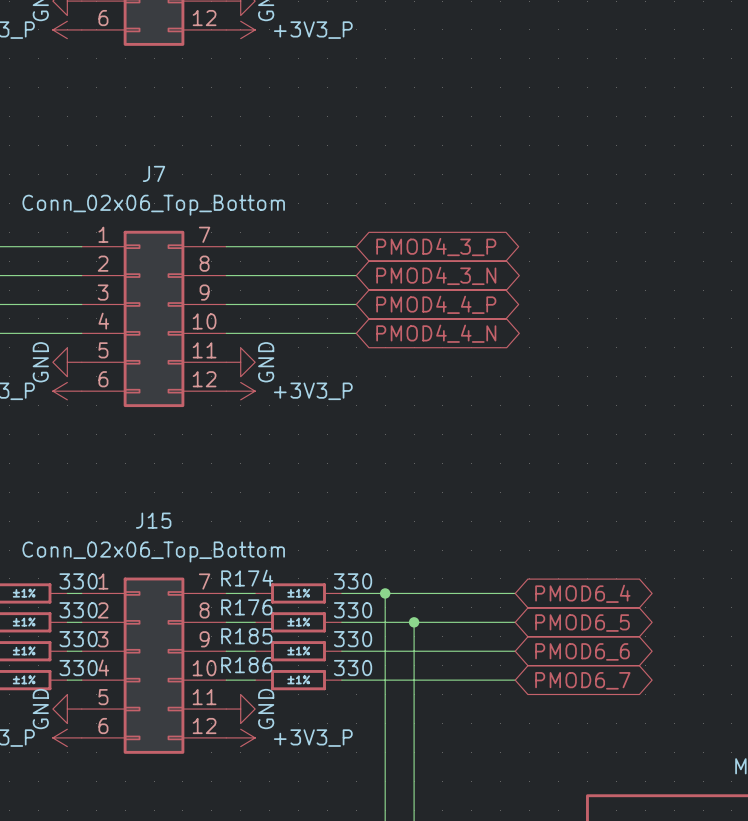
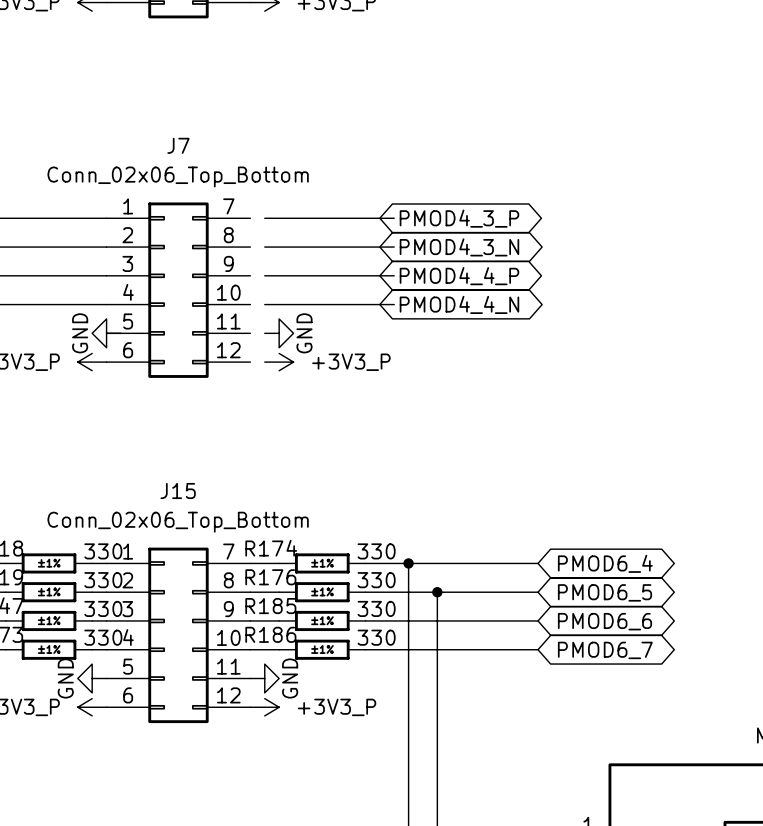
wire: (226, 246) (240, 246) -> (379, 218) (394, 218)
wire: (226, 275) (240, 275) -> (379, 247) (394, 247)
wire: (226, 304) (240, 304) -> (379, 275) (394, 275)
wire: (226, 333) (240, 333) -> (379, 304) (394, 304)
power symbol position: GND (67, 362) -> GND (106, 333)
power symbol position: GND (240, 362) -> GND (279, 333)
power symbol position: +3V3_P (240, 391) -> +3V3_P (279, 362)

